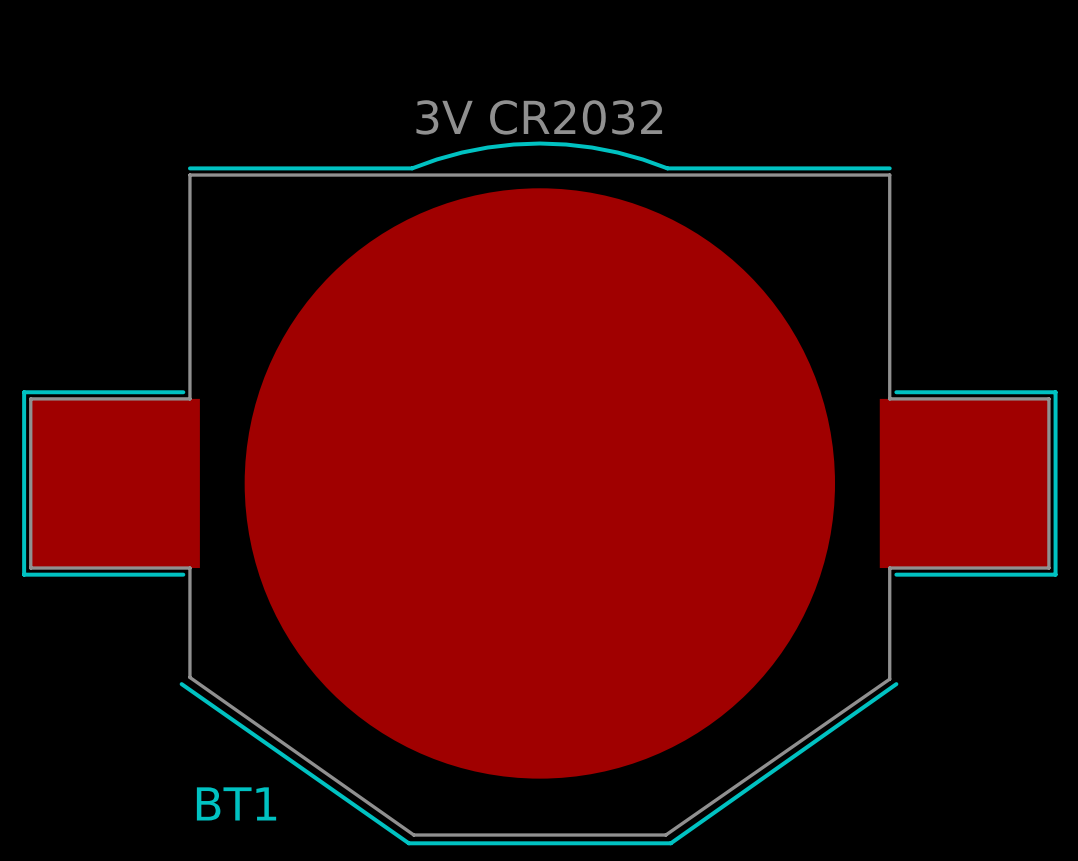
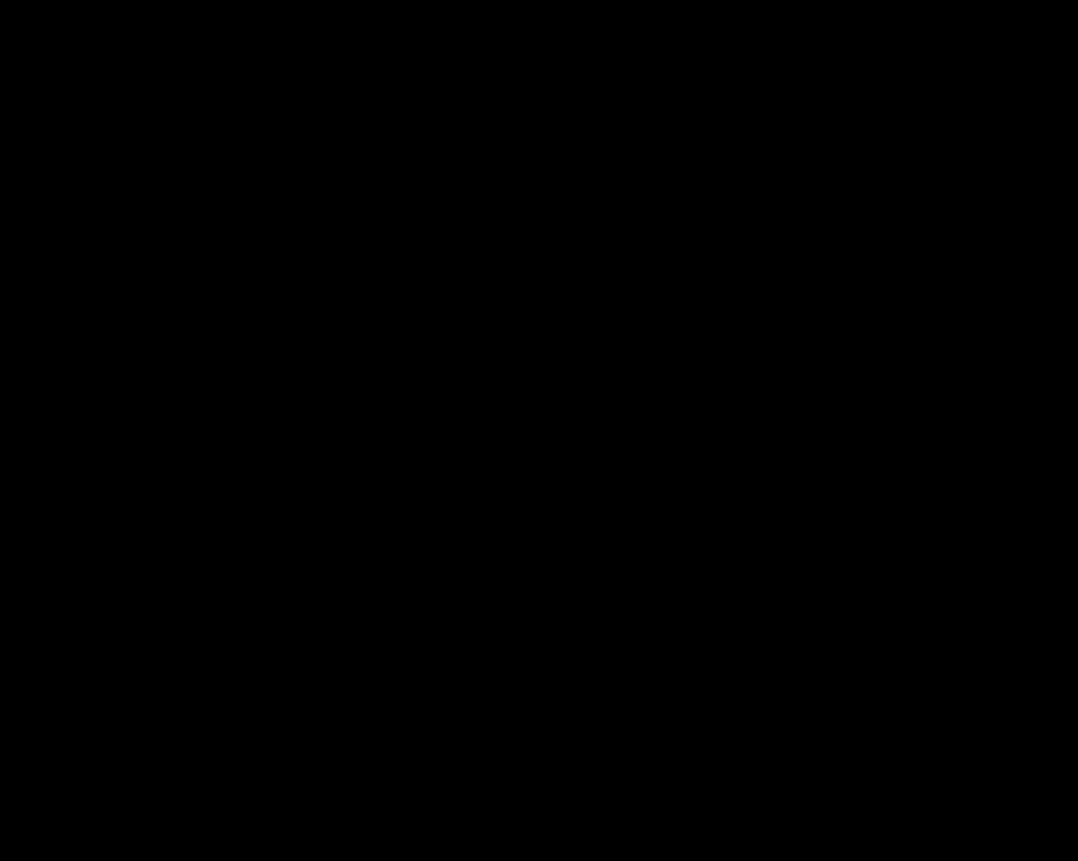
BT1: 3V CR2032 (539, 493) -> none

